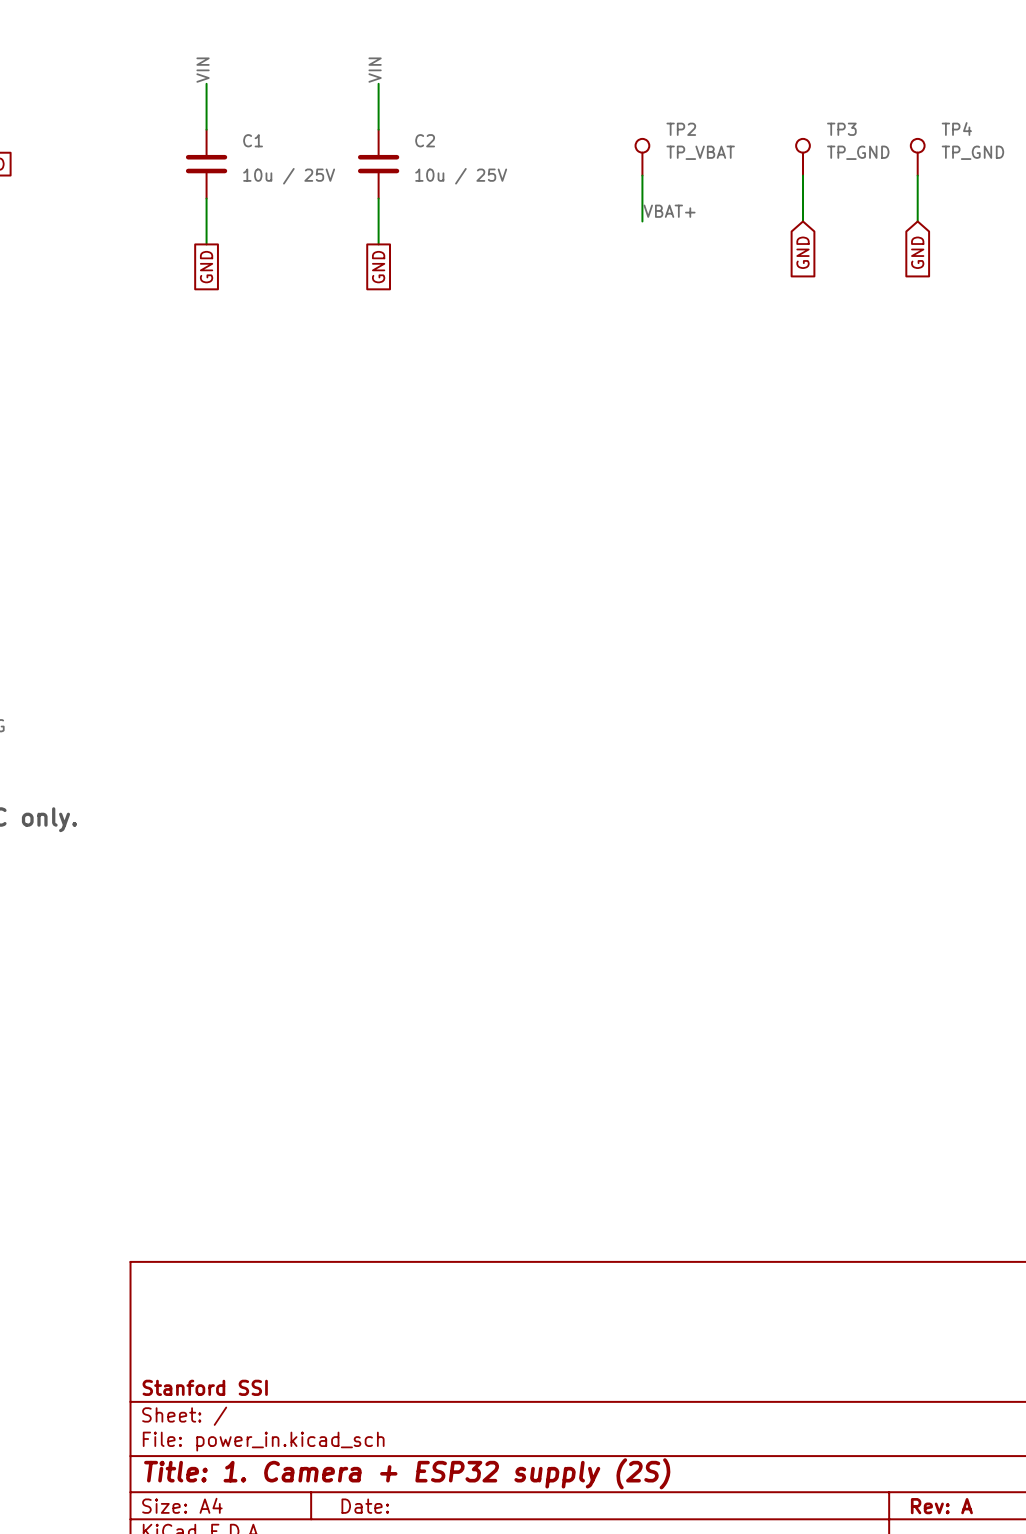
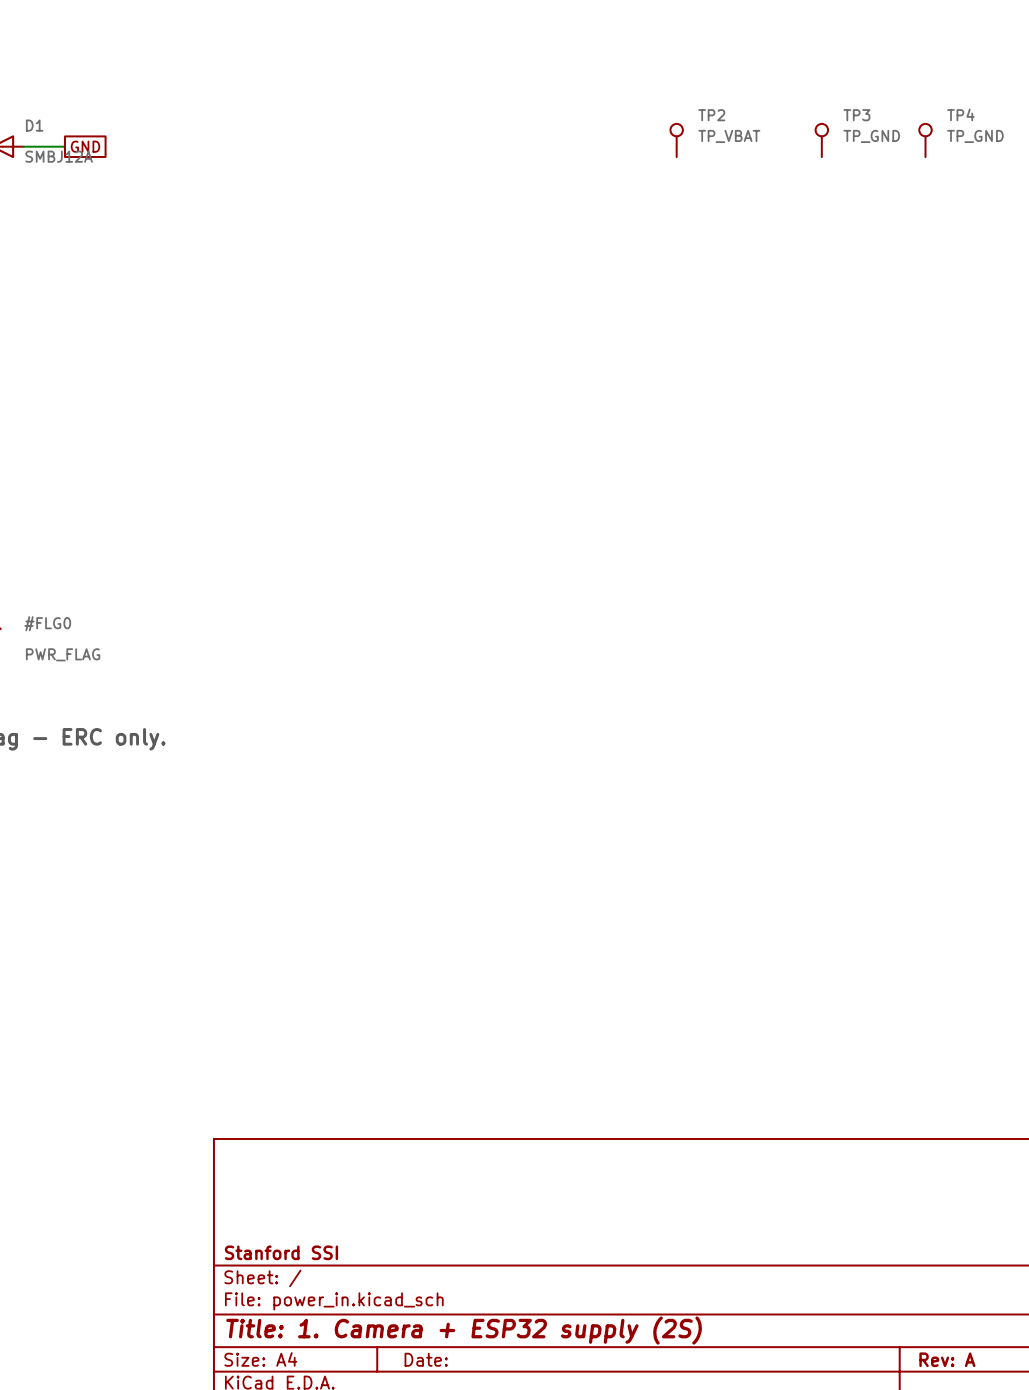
label: VIN (203, 70) -> none
label: VIN (375, 70) -> none
wire: (206, 83) (206, 129) -> none
wire: (378, 83) (378, 129) -> none
C1: 10u / 25V (206, 164) -> none
C2: 10u / 25V (378, 164) -> none
wire: (642, 175) (642, 221) -> none
wire: (803, 175) (803, 221) -> none
wire: (917, 175) (917, 221) -> none
wire: (206, 198) (206, 244) -> none
wire: (378, 198) (378, 244) -> none
label: VBAT+ (669, 211) -> none
global label: GND (803, 252) -> none
global label: GND (917, 252) -> none
global label: GND (206, 267) -> none
global label: GND (378, 267) -> none

